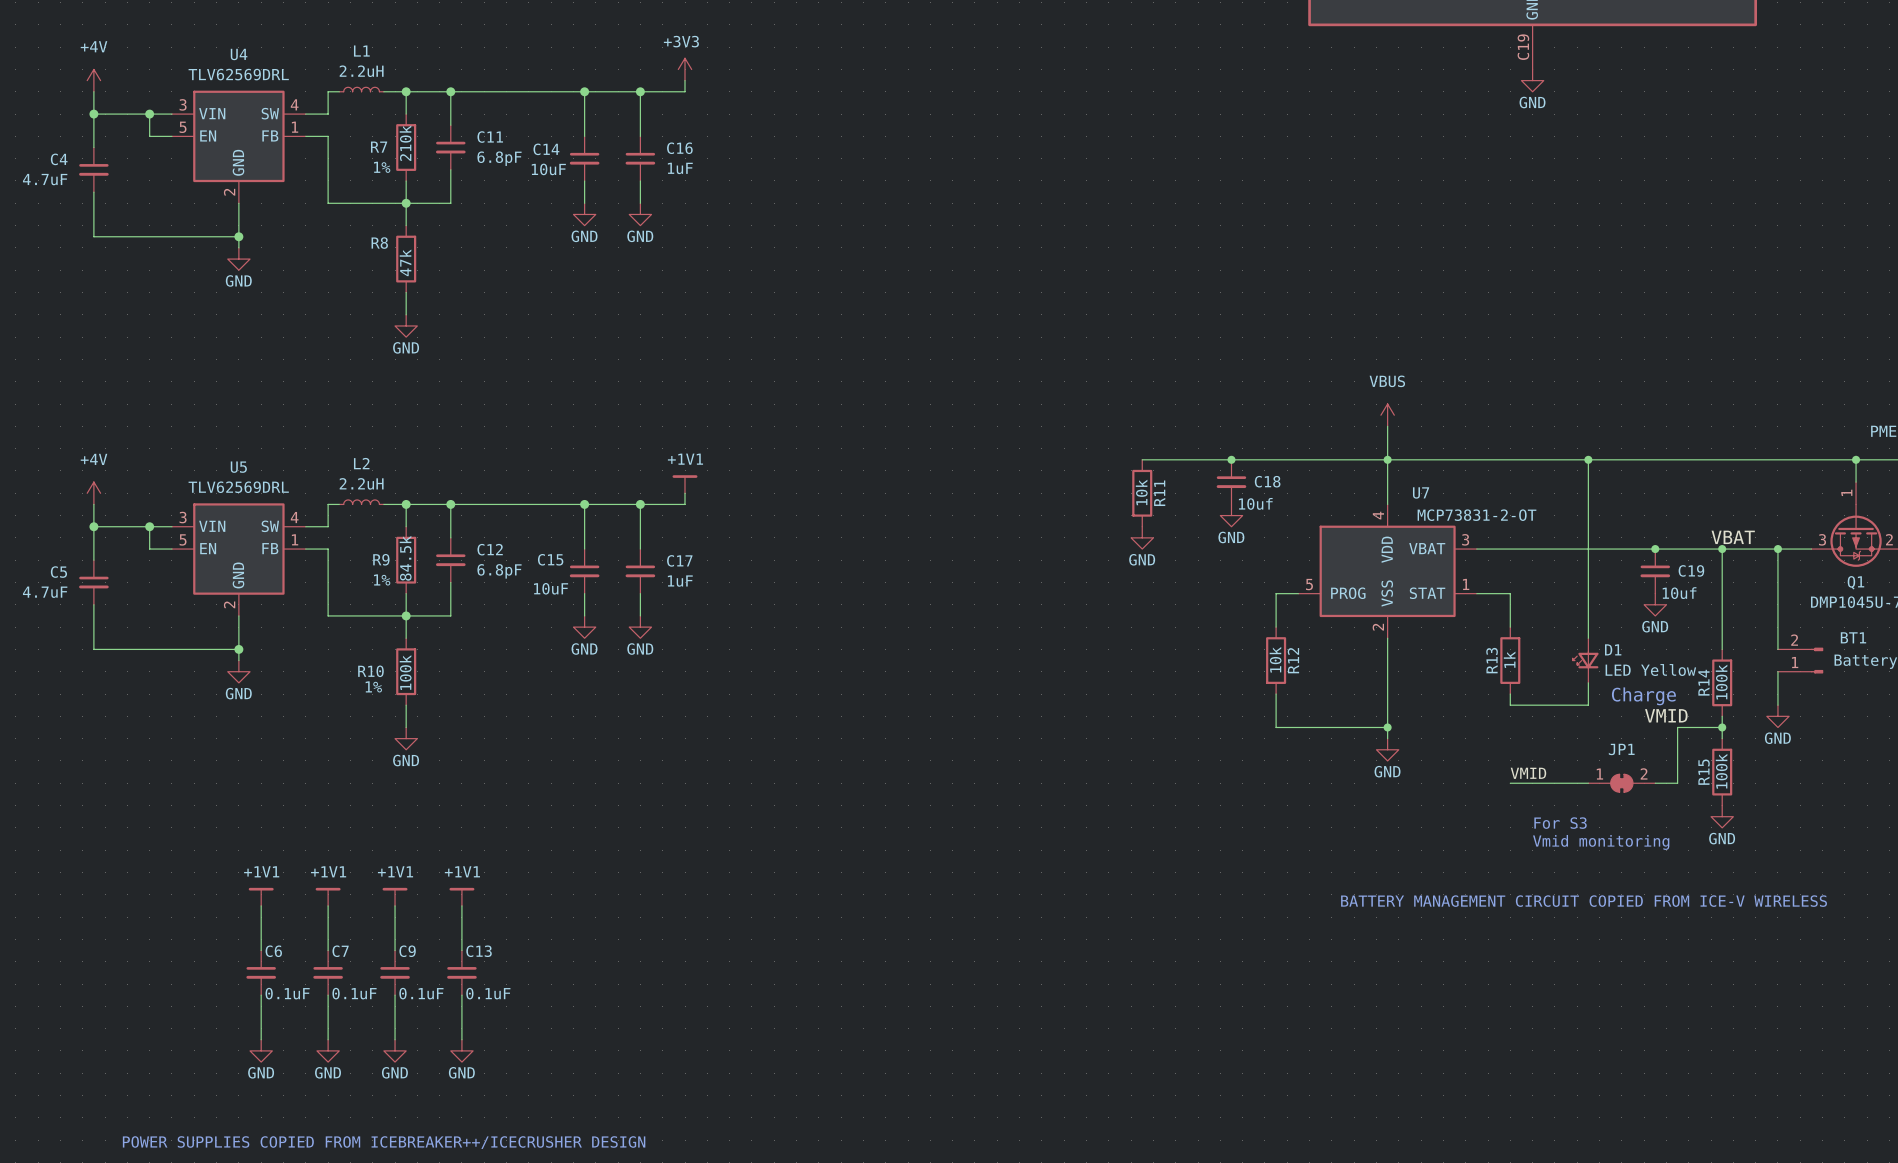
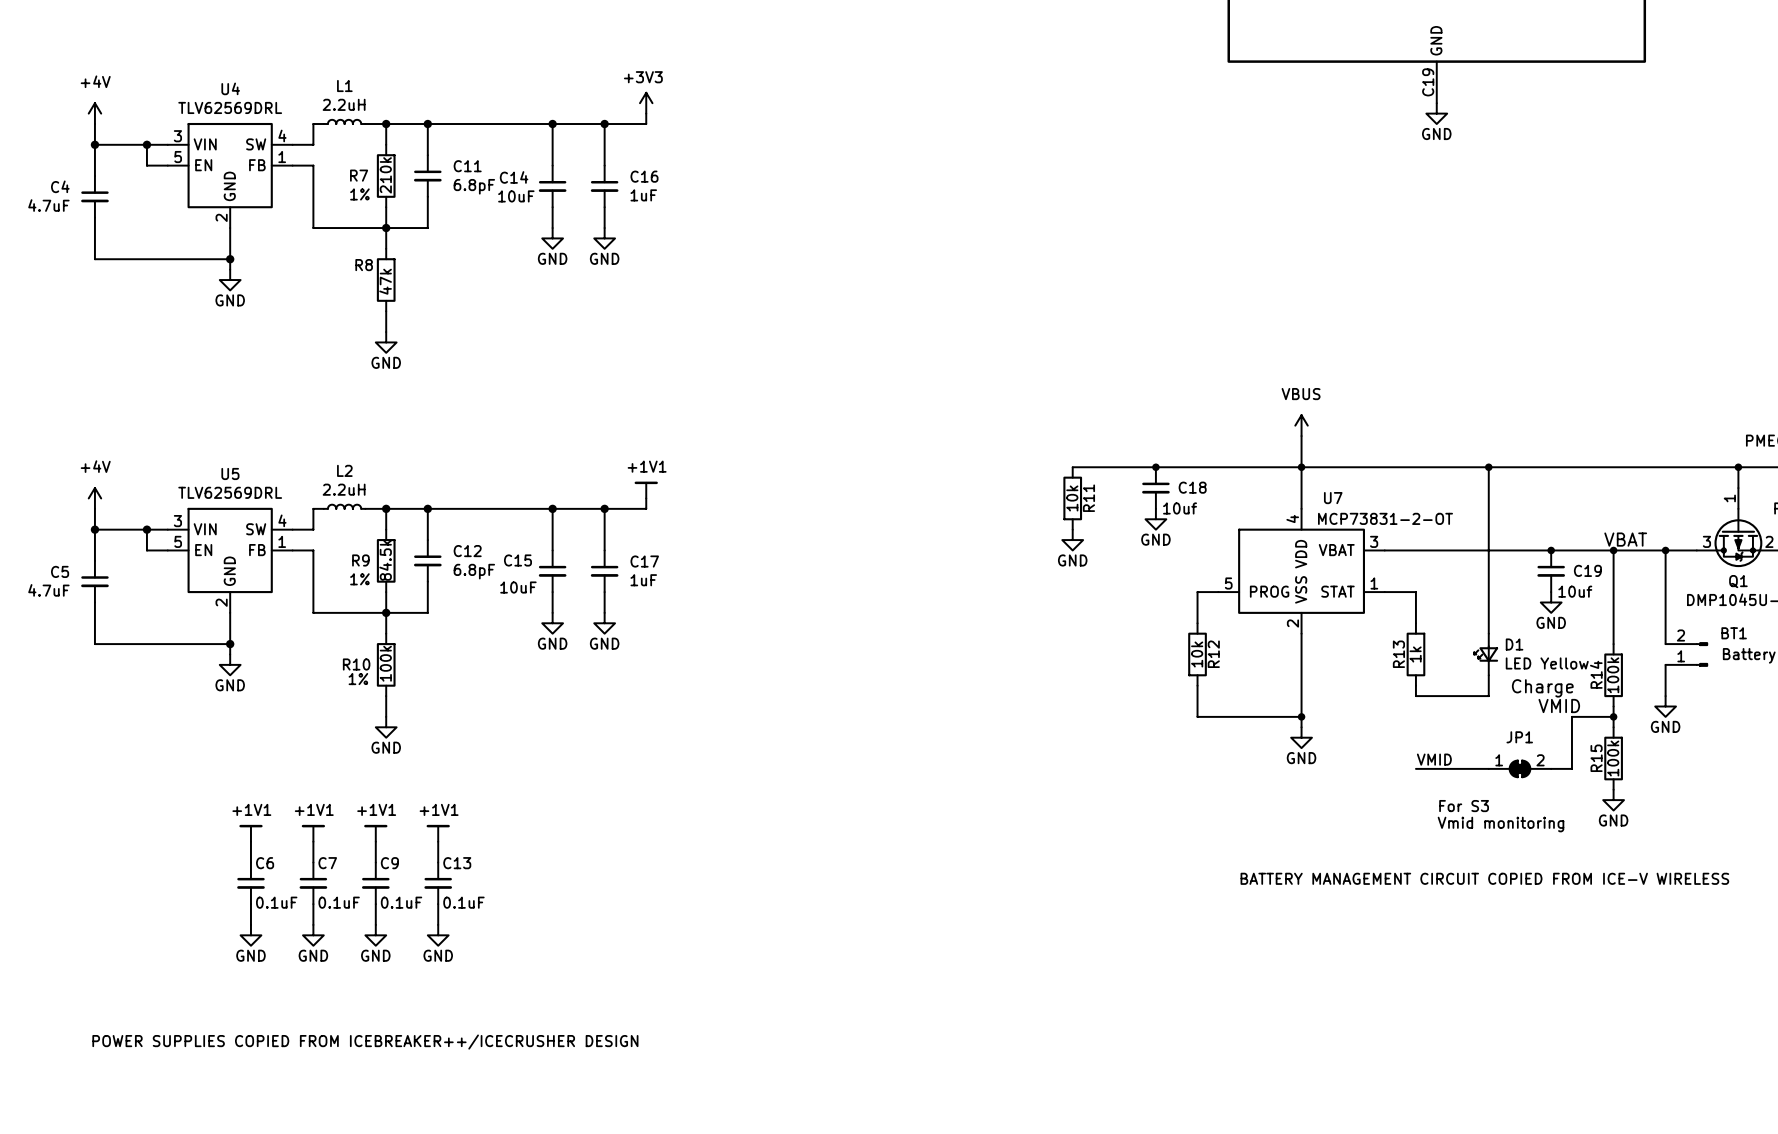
power symbol: none -> +1V1 (250, 833)
power symbol: none -> +1V1 (313, 833)
power symbol: none -> +1V1 (375, 833)
power symbol: none -> +1V1 (438, 833)
power symbol: +1V1 (261, 896) -> none
power symbol: +1V1 (328, 896) -> none
power symbol: +1V1 (395, 896) -> none
power symbol: +1V1 (461, 896) -> none
power symbol: none -> GND (250, 935)
power symbol: none -> GND (313, 935)
power symbol: none -> GND (375, 935)
power symbol: none -> GND (438, 935)
C6 position: (261, 972) -> (250, 883)
C7 position: (328, 972) -> (313, 883)
C9 position: (395, 972) -> (375, 883)
C13 position: (461, 972) -> (438, 883)
wire: (261, 995) (261, 1039) -> none
wire: (328, 995) (328, 1039) -> none
wire: (395, 995) (395, 1039) -> none
wire: (461, 995) (461, 1039) -> none
power symbol: GND (261, 1050) -> none
power symbol: GND (328, 1050) -> none
power symbol: GND (395, 1050) -> none
power symbol: GND (461, 1050) -> none
text position: POWER SUPPLIES COPIED FROM ICEBREAKER++/ICECRUSHER DESIGN (384, 1142) -> POWER SUPPLIES COPIED FROM ICEBREAKER++/ICECRUSHER DESIGN (365, 1042)

